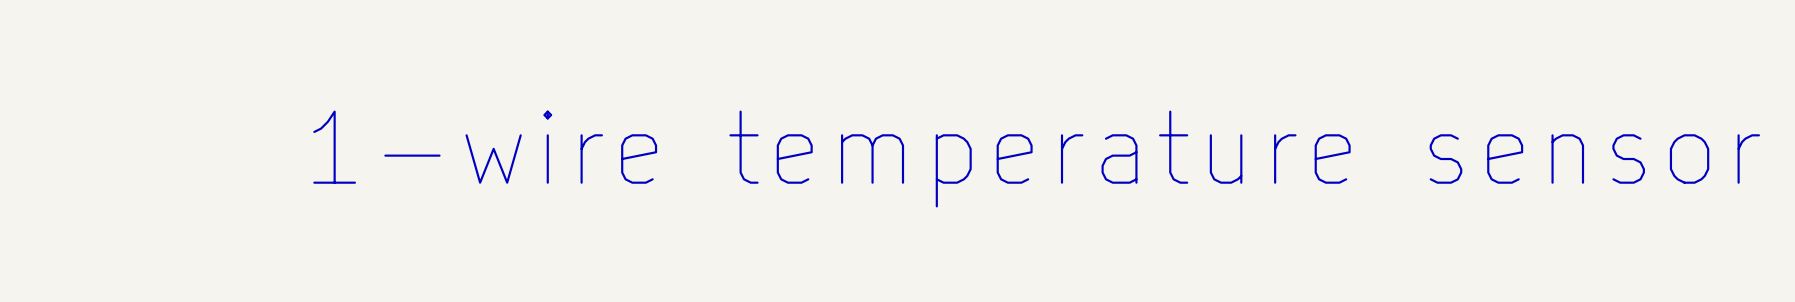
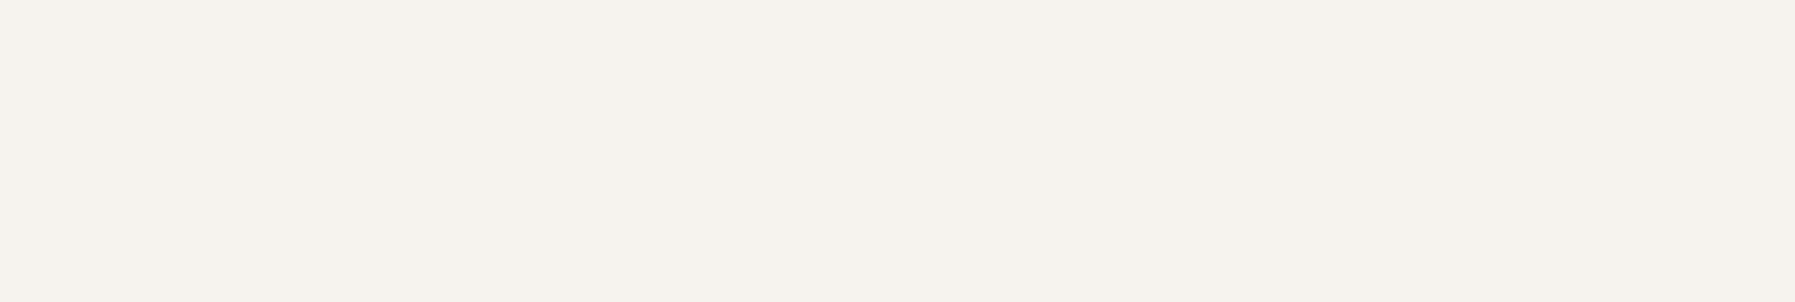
text: 1-wire temperature sensor (1036, 159) -> none

